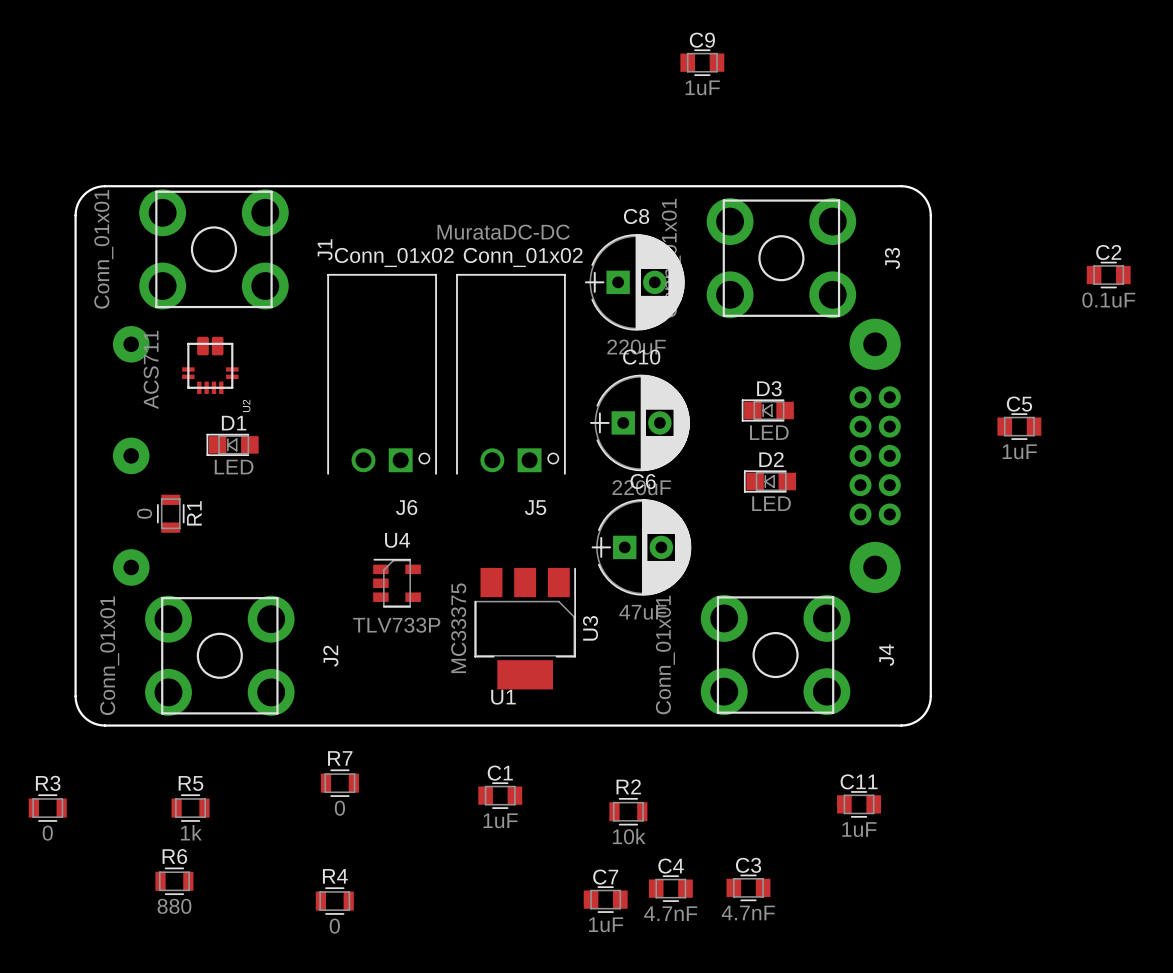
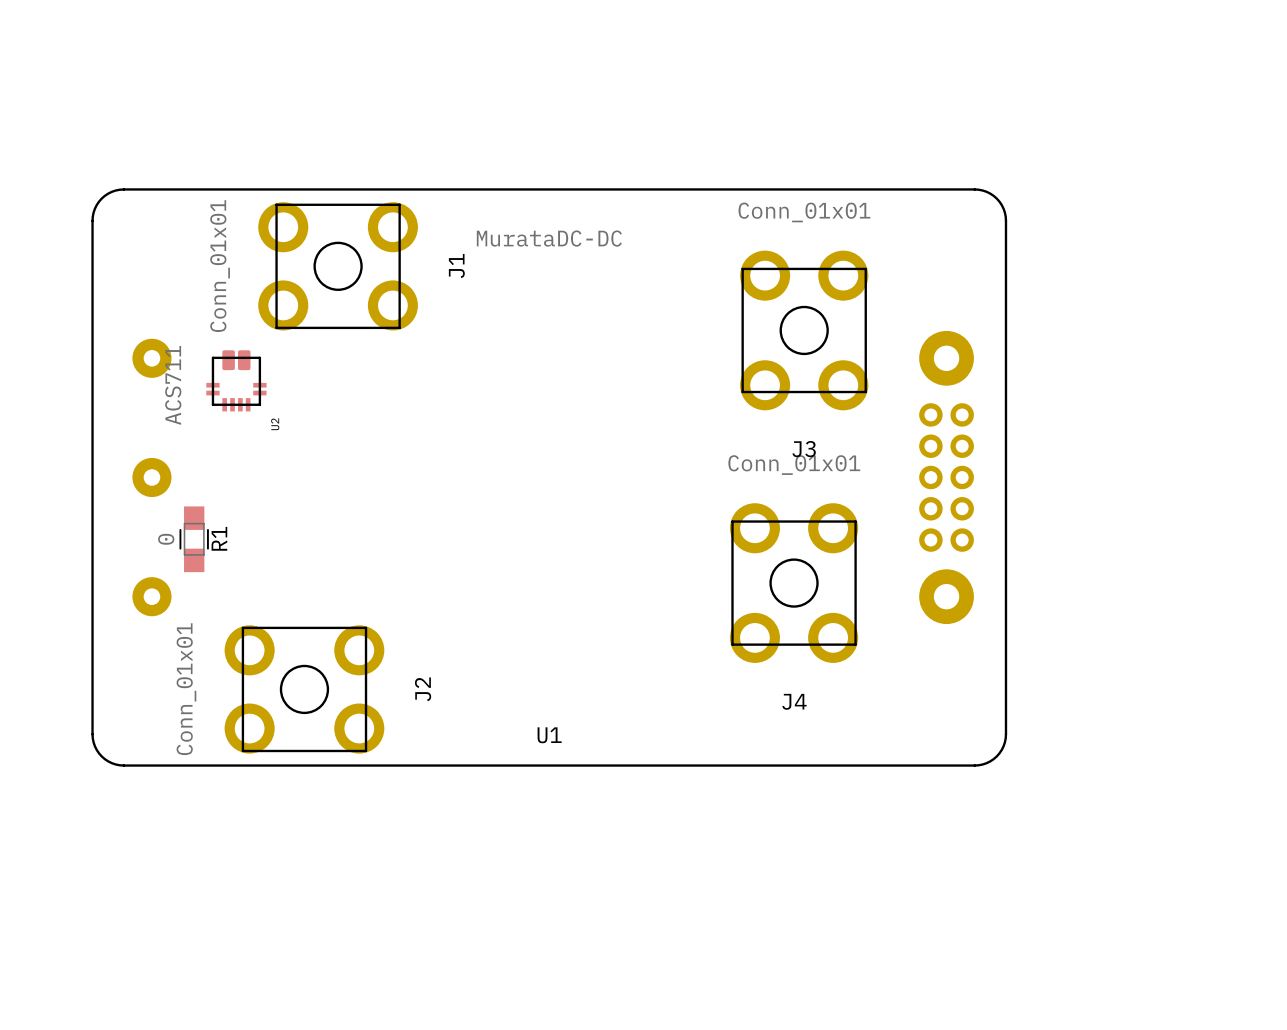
C9: 1uF (702, 62) -> none
J1 position: (213, 249) -> (338, 266)
J3 rotation: 0° (781, 258) -> 90° clockwise (804, 330)
C2: 0.1uF (1108, 275) -> none
C8: 220uF (634, 282) -> none
J6: Conn_01x02 (382, 374) -> none
J5: Conn_01x02 (510, 374) -> none
D3: LED (767, 410) -> none
C10: 220uF (640, 422) -> none
C5: 1uF (1019, 426) -> none
D1: LED (232, 444) -> none
D2: LED (770, 481) -> none
R1 footprint: [157, 494, 185, 533] -> [179, 506, 209, 573]
C6: 47uF (641, 547) -> none
U4: TLV733P (397, 583) -> none
U3: MC33375 (525, 628) -> none
J2 position: (219, 655) -> (304, 689)
J4 rotation: 0° (775, 655) -> 90° clockwise (794, 583)
J4 position: (775, 655) -> (794, 583)
R7: 0 (339, 783) -> none
C1: 1uF (500, 795) -> none
C11: 1uF (859, 804) -> none
R3: 0 (47, 808) -> none
R5: 1k (190, 808) -> none
R2: 10k (628, 811) -> none
R6: 880 (174, 881) -> none
C3: 4.7nF (748, 887) -> none
C4: 4.7nF (670, 888) -> none
C7: 1uF (605, 899) -> none
R4: 0 (334, 901) -> none

